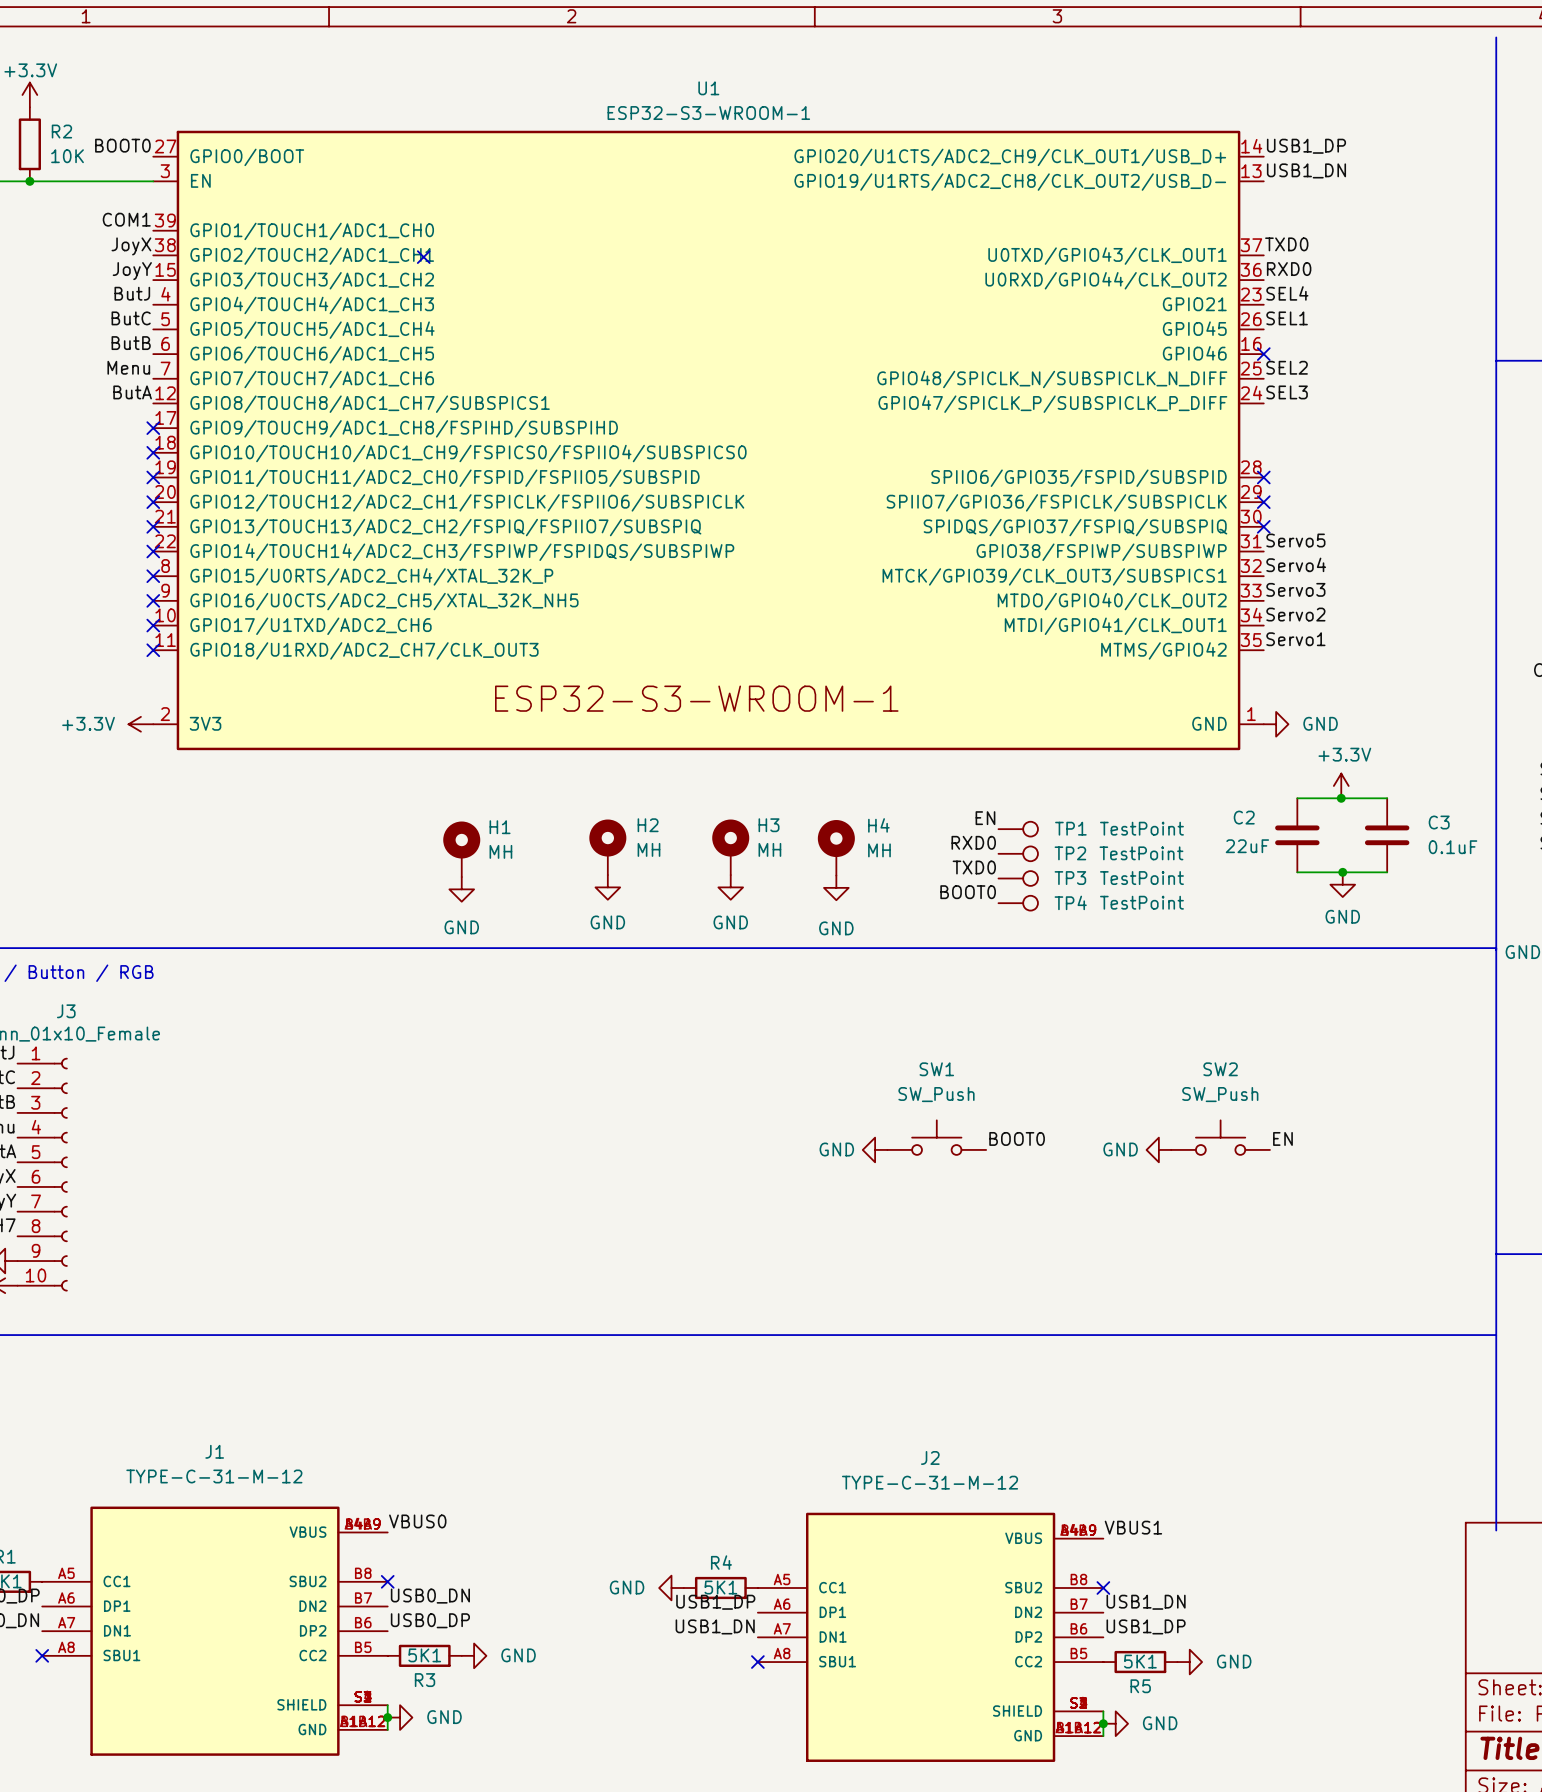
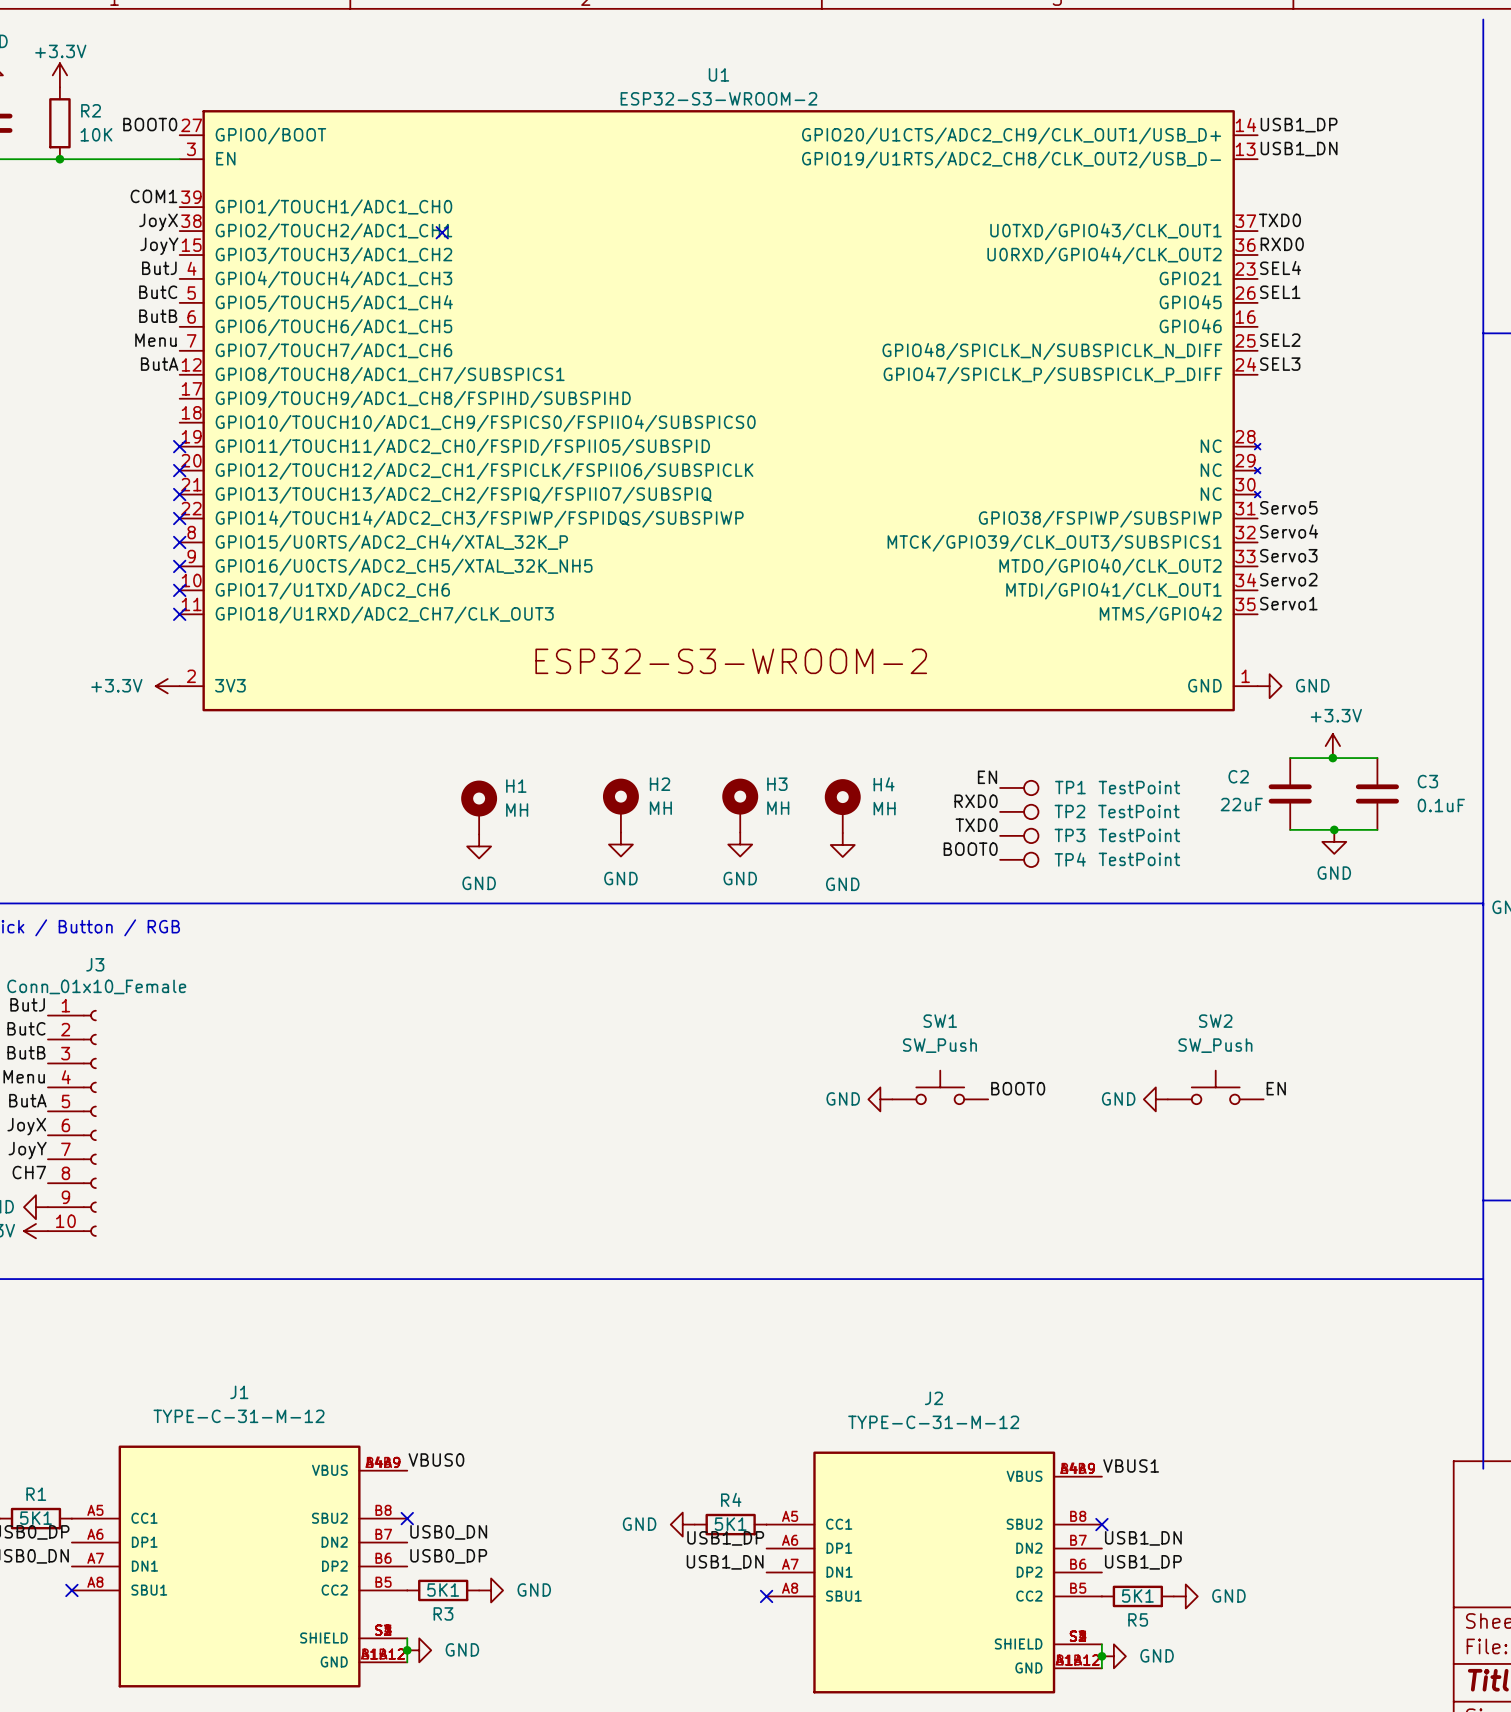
U1 value: ESP32-S3-WROOM-1 (708, 113) -> ESP32-S3-WROOM-2 (718, 98)
U1 symbol: [153, 130, 1264, 751] -> [179, 110, 1261, 712]
no-connect mark: (1263, 354) -> none
no-connect mark: (153, 428) -> none
no-connect mark: (153, 452) -> none
no-connect mark: (1263, 477) -> none
no-connect mark: (1263, 502) -> none
no-connect mark: (1263, 526) -> none

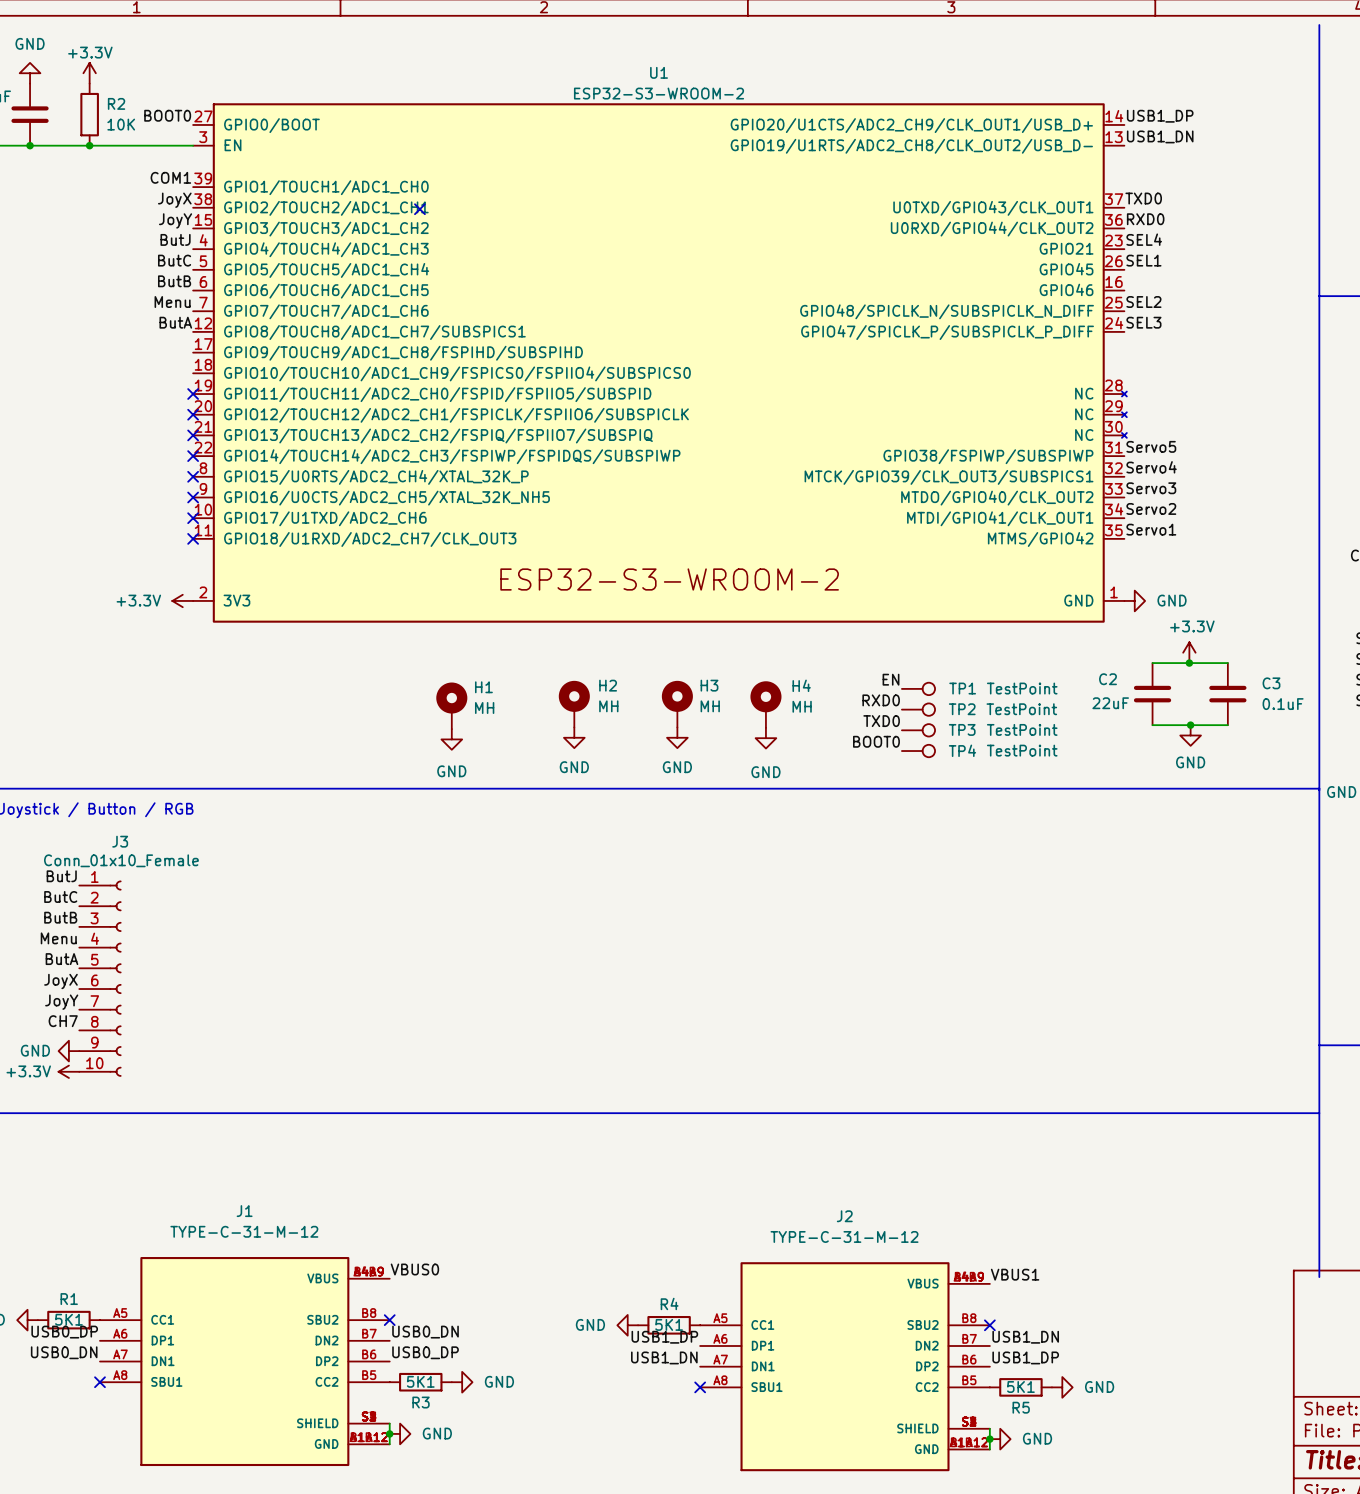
SW1: SW_Push (940, 1087) -> none
SW2: SW_Push (1215, 1087) -> none
label: BOOT0 (1018, 1088) -> none
label: EN (1276, 1088) -> none
power symbol: GND (880, 1099) -> none
power symbol: GND (1155, 1099) -> none

